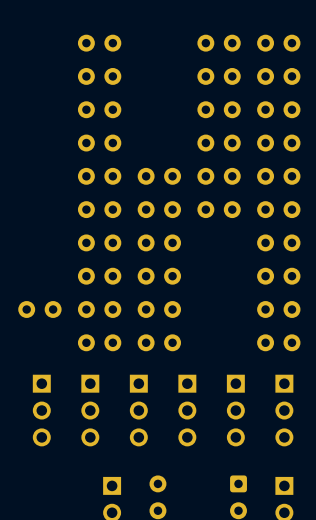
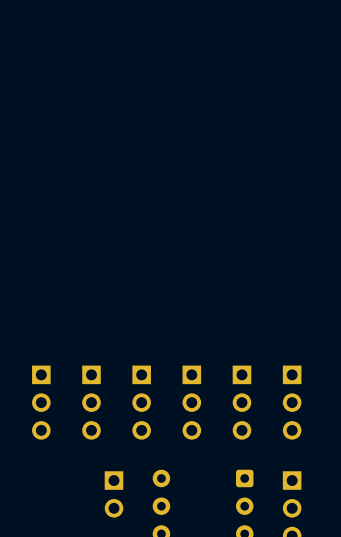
part: (99, 43) -> none
part: (219, 43) -> none
part: (278, 43) -> none
part: (99, 76) -> none
part: (219, 76) -> none
part: (278, 76) -> none
part: (99, 109) -> none
part: (219, 109) -> none
part: (278, 109) -> none
part: (99, 143) -> none
part: (219, 143) -> none
part: (278, 143) -> none
part: (99, 176) -> none
part: (159, 176) -> none
part: (219, 176) -> none
part: (278, 176) -> none
part: (99, 209) -> none
part: (159, 209) -> none
part: (219, 209) -> none
part: (278, 209) -> none
part: (99, 242) -> none
part: (159, 242) -> none
part: (278, 242) -> none
part: (99, 276) -> none
part: (159, 276) -> none
part: (278, 276) -> none
part: (39, 309) -> none
part: (99, 309) -> none
part: (159, 309) -> none
part: (278, 309) -> none
part: (99, 342) -> none
part: (159, 342) -> none
part: (278, 342) -> none

